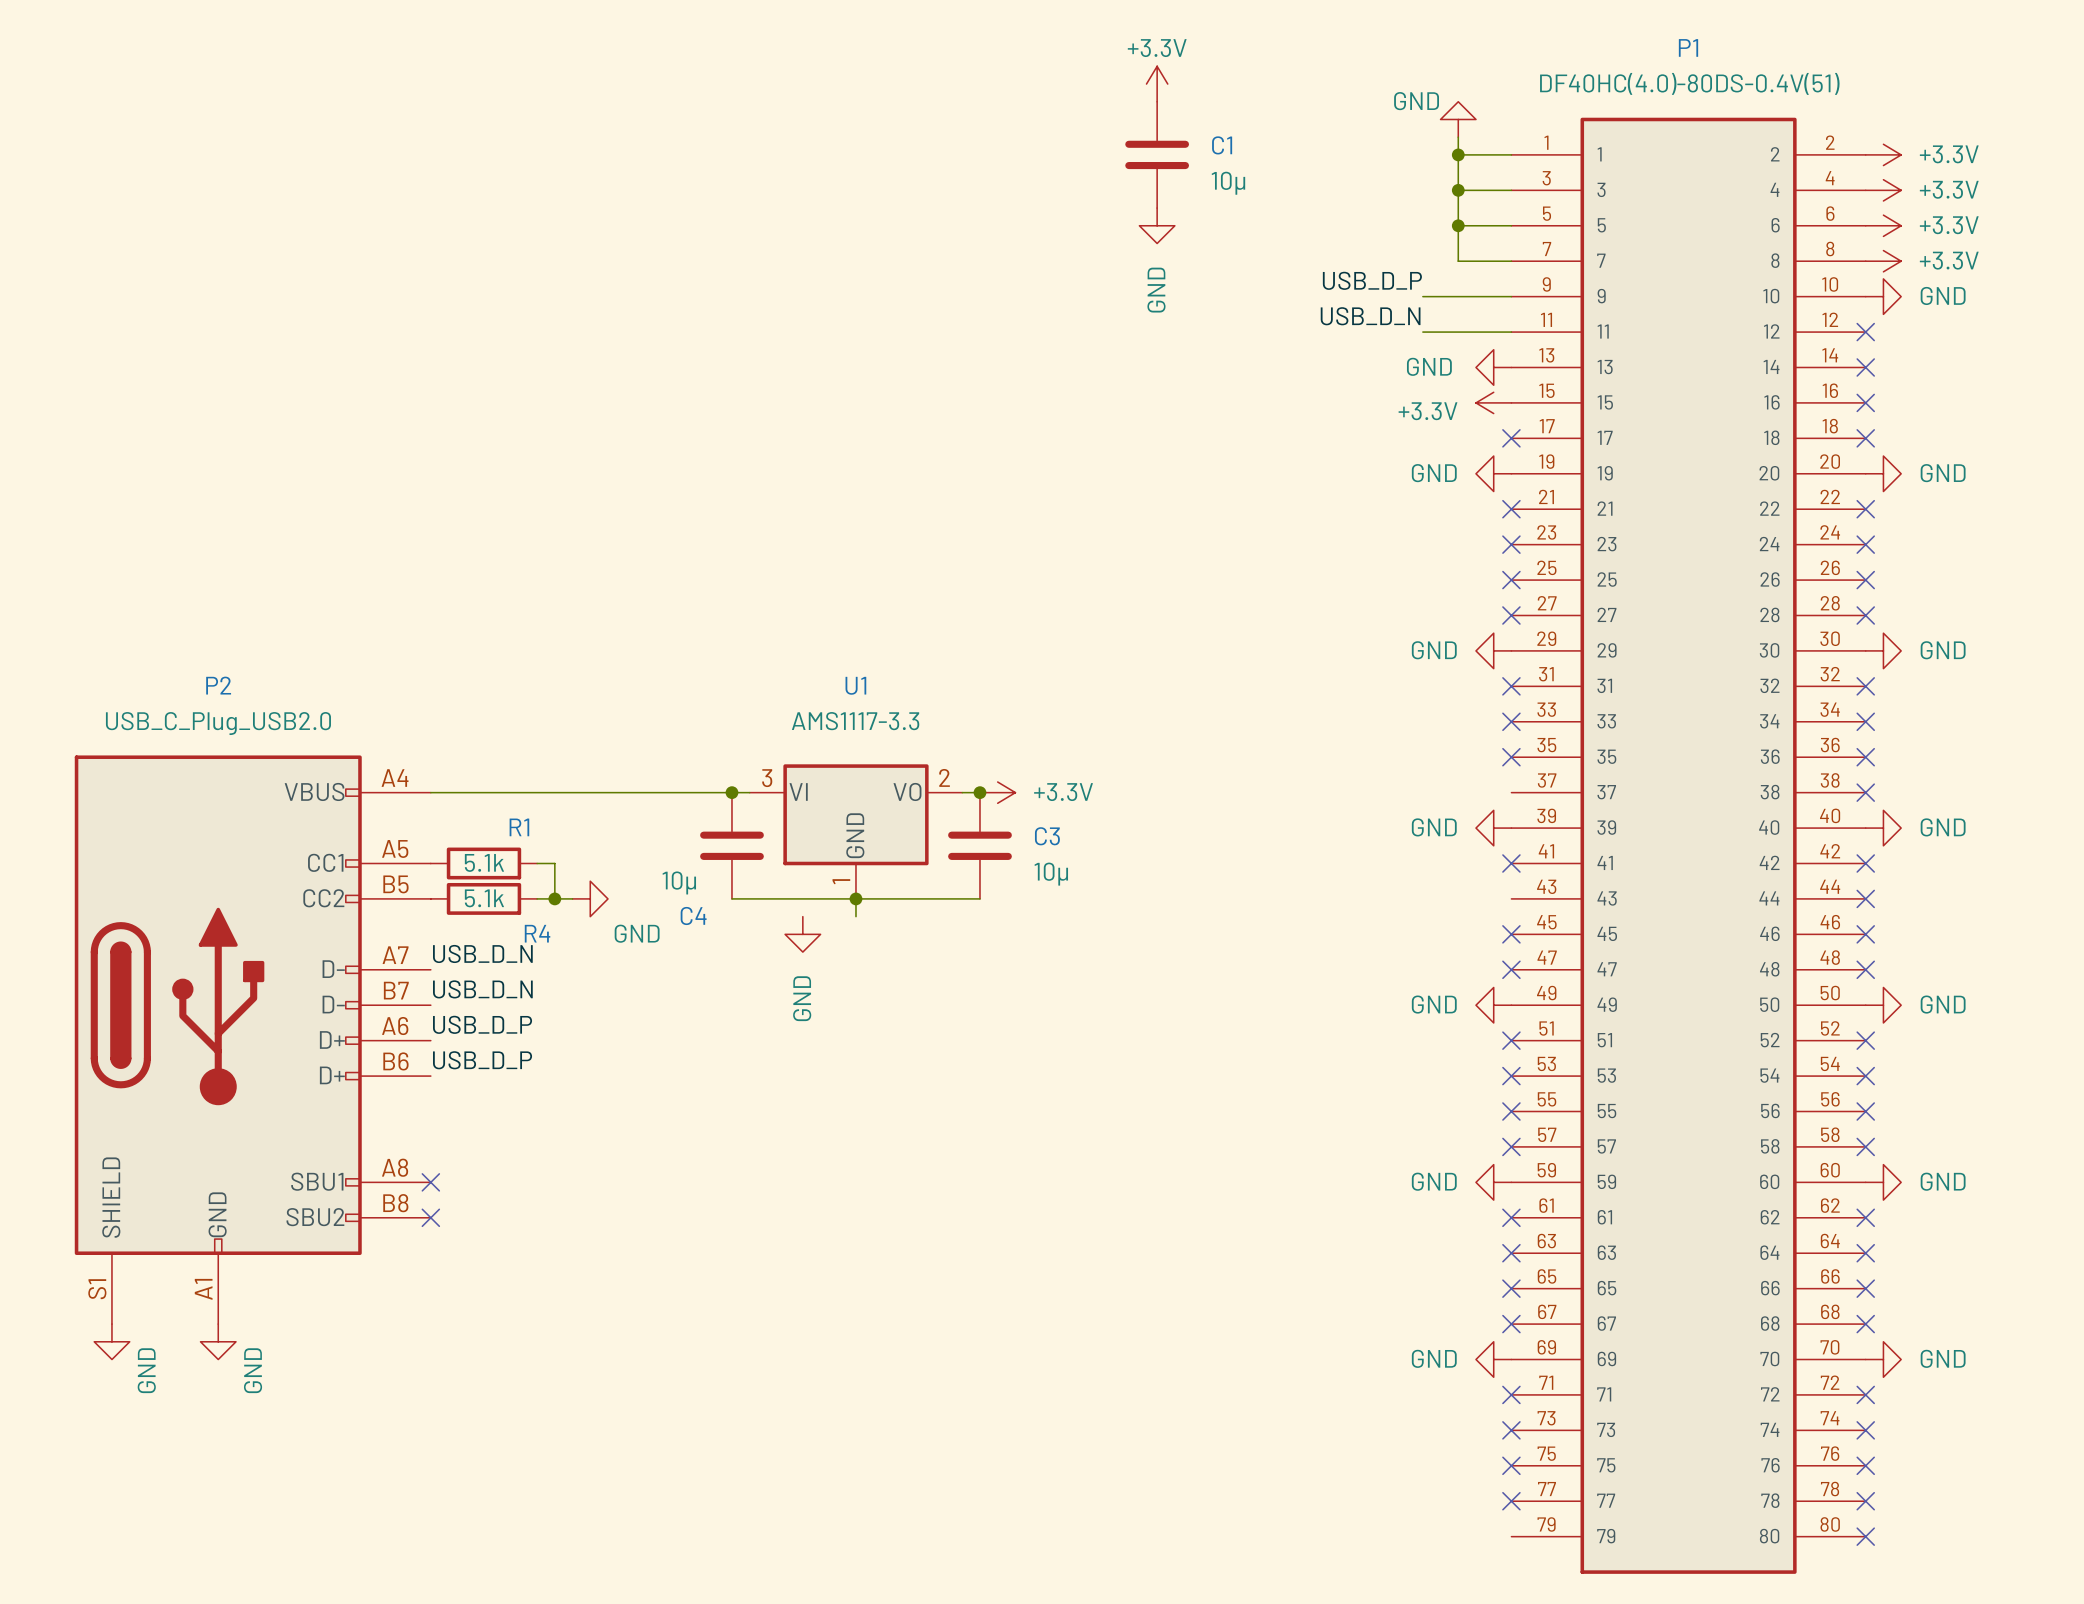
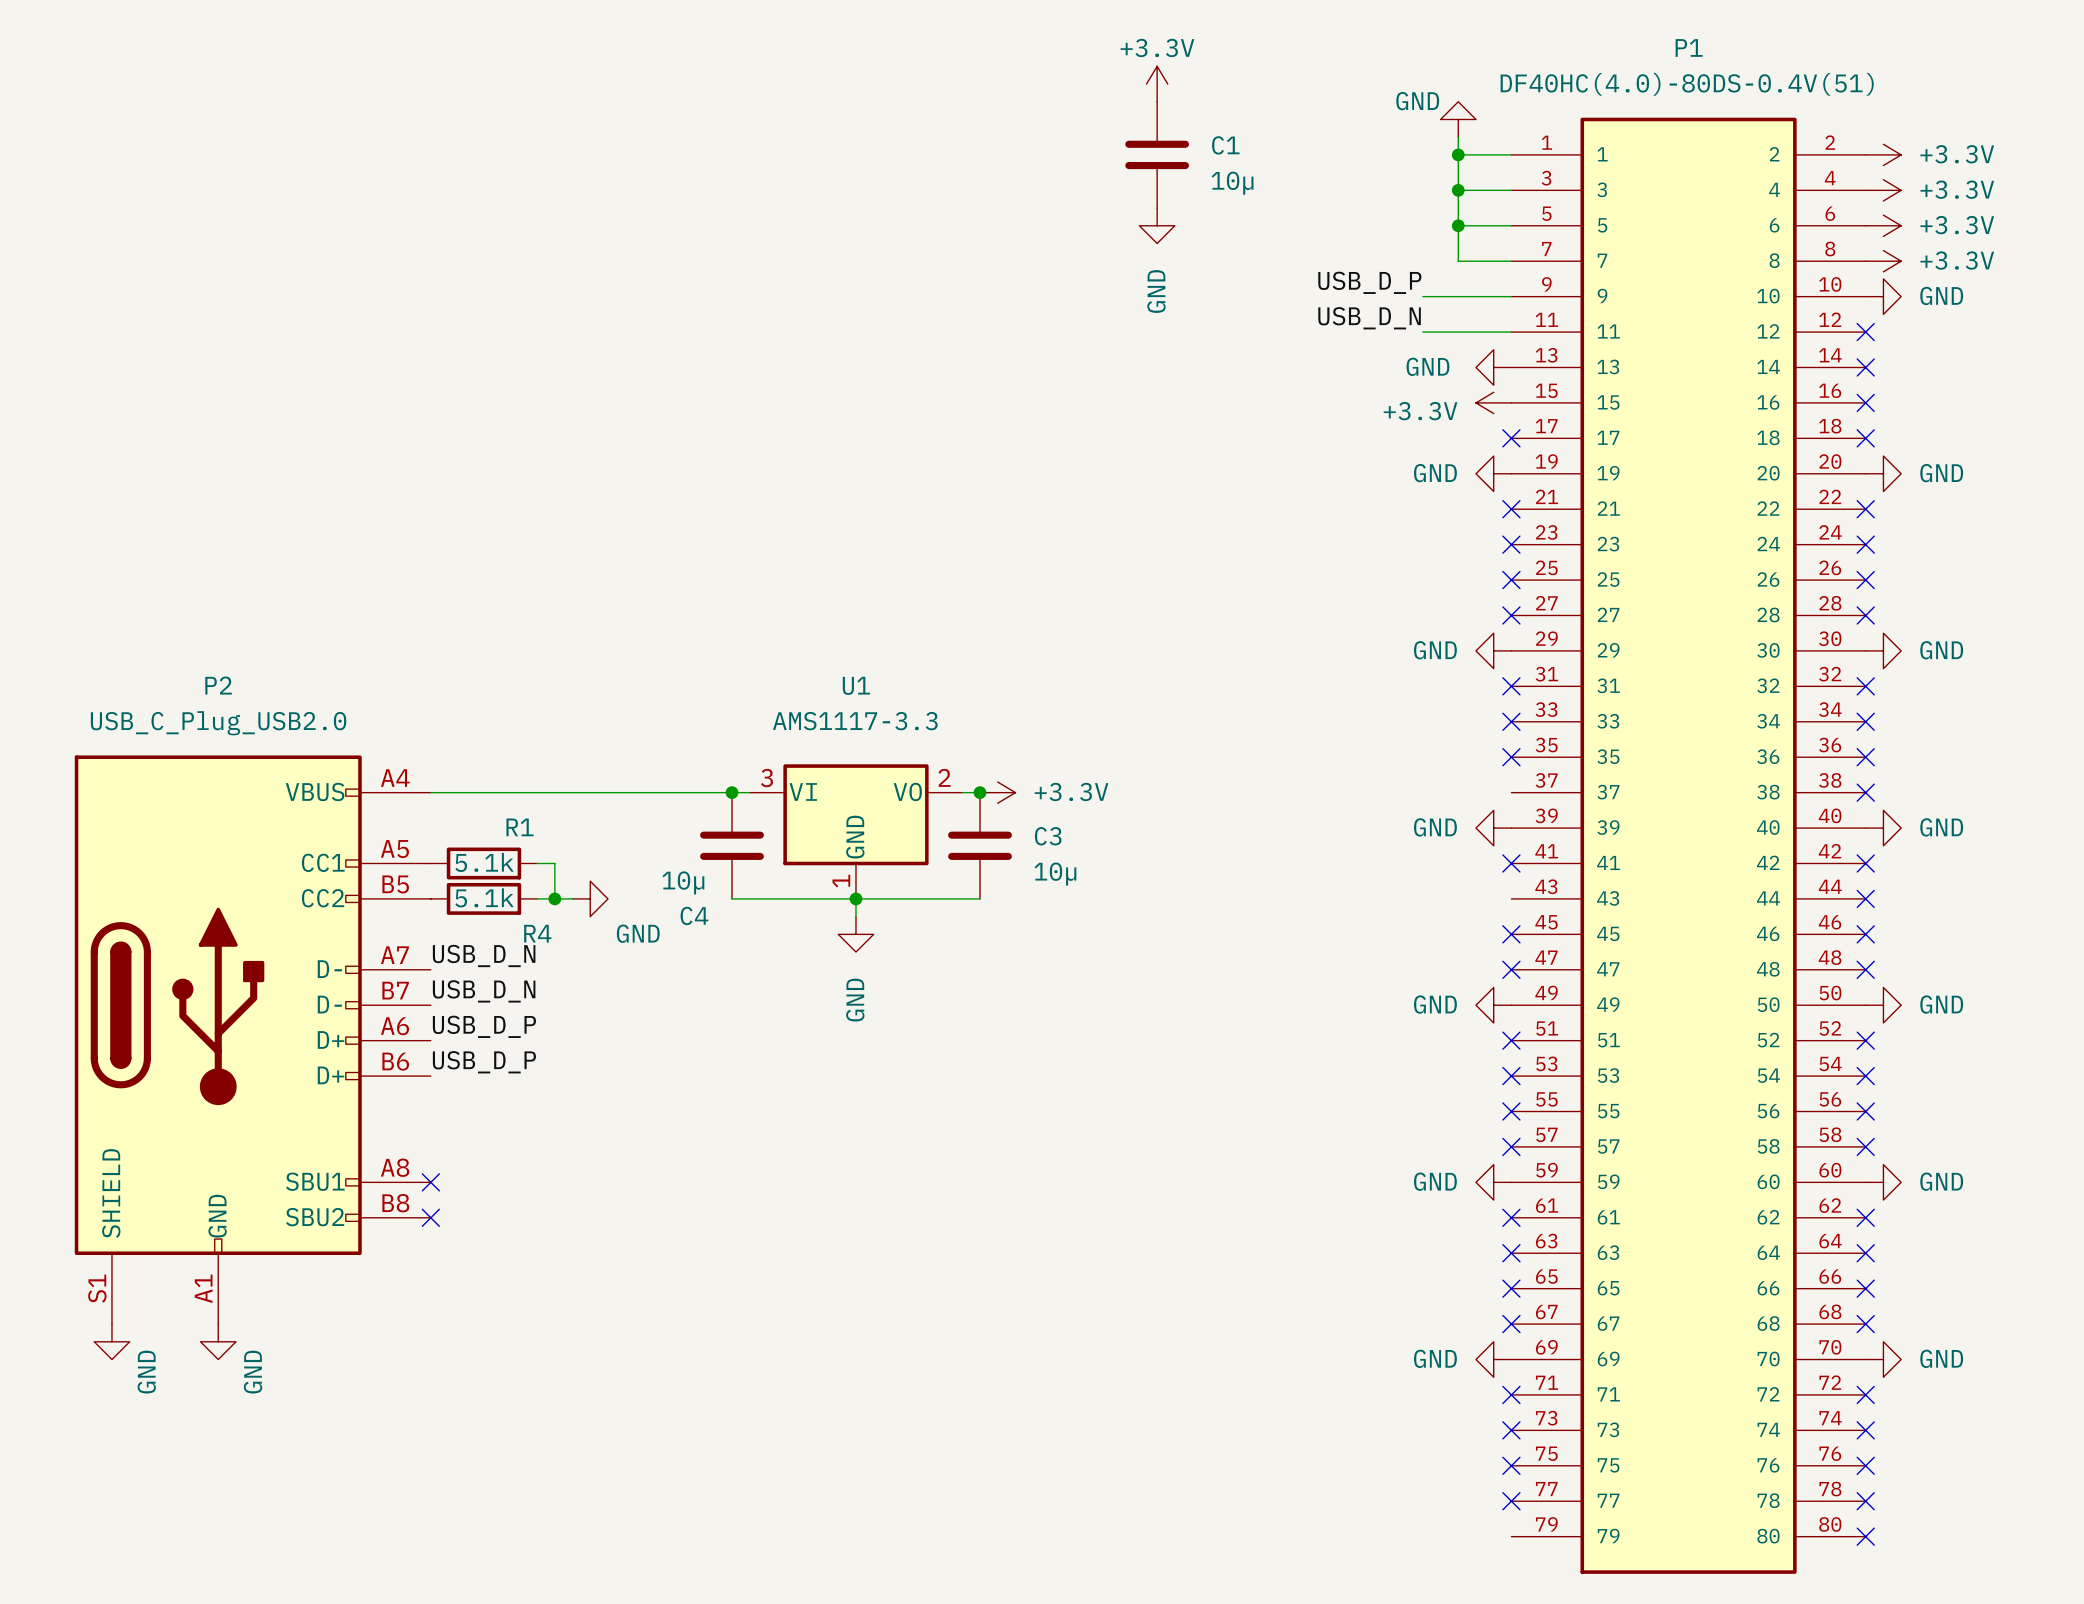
power symbol position: GND (802, 934) -> GND (855, 934)

